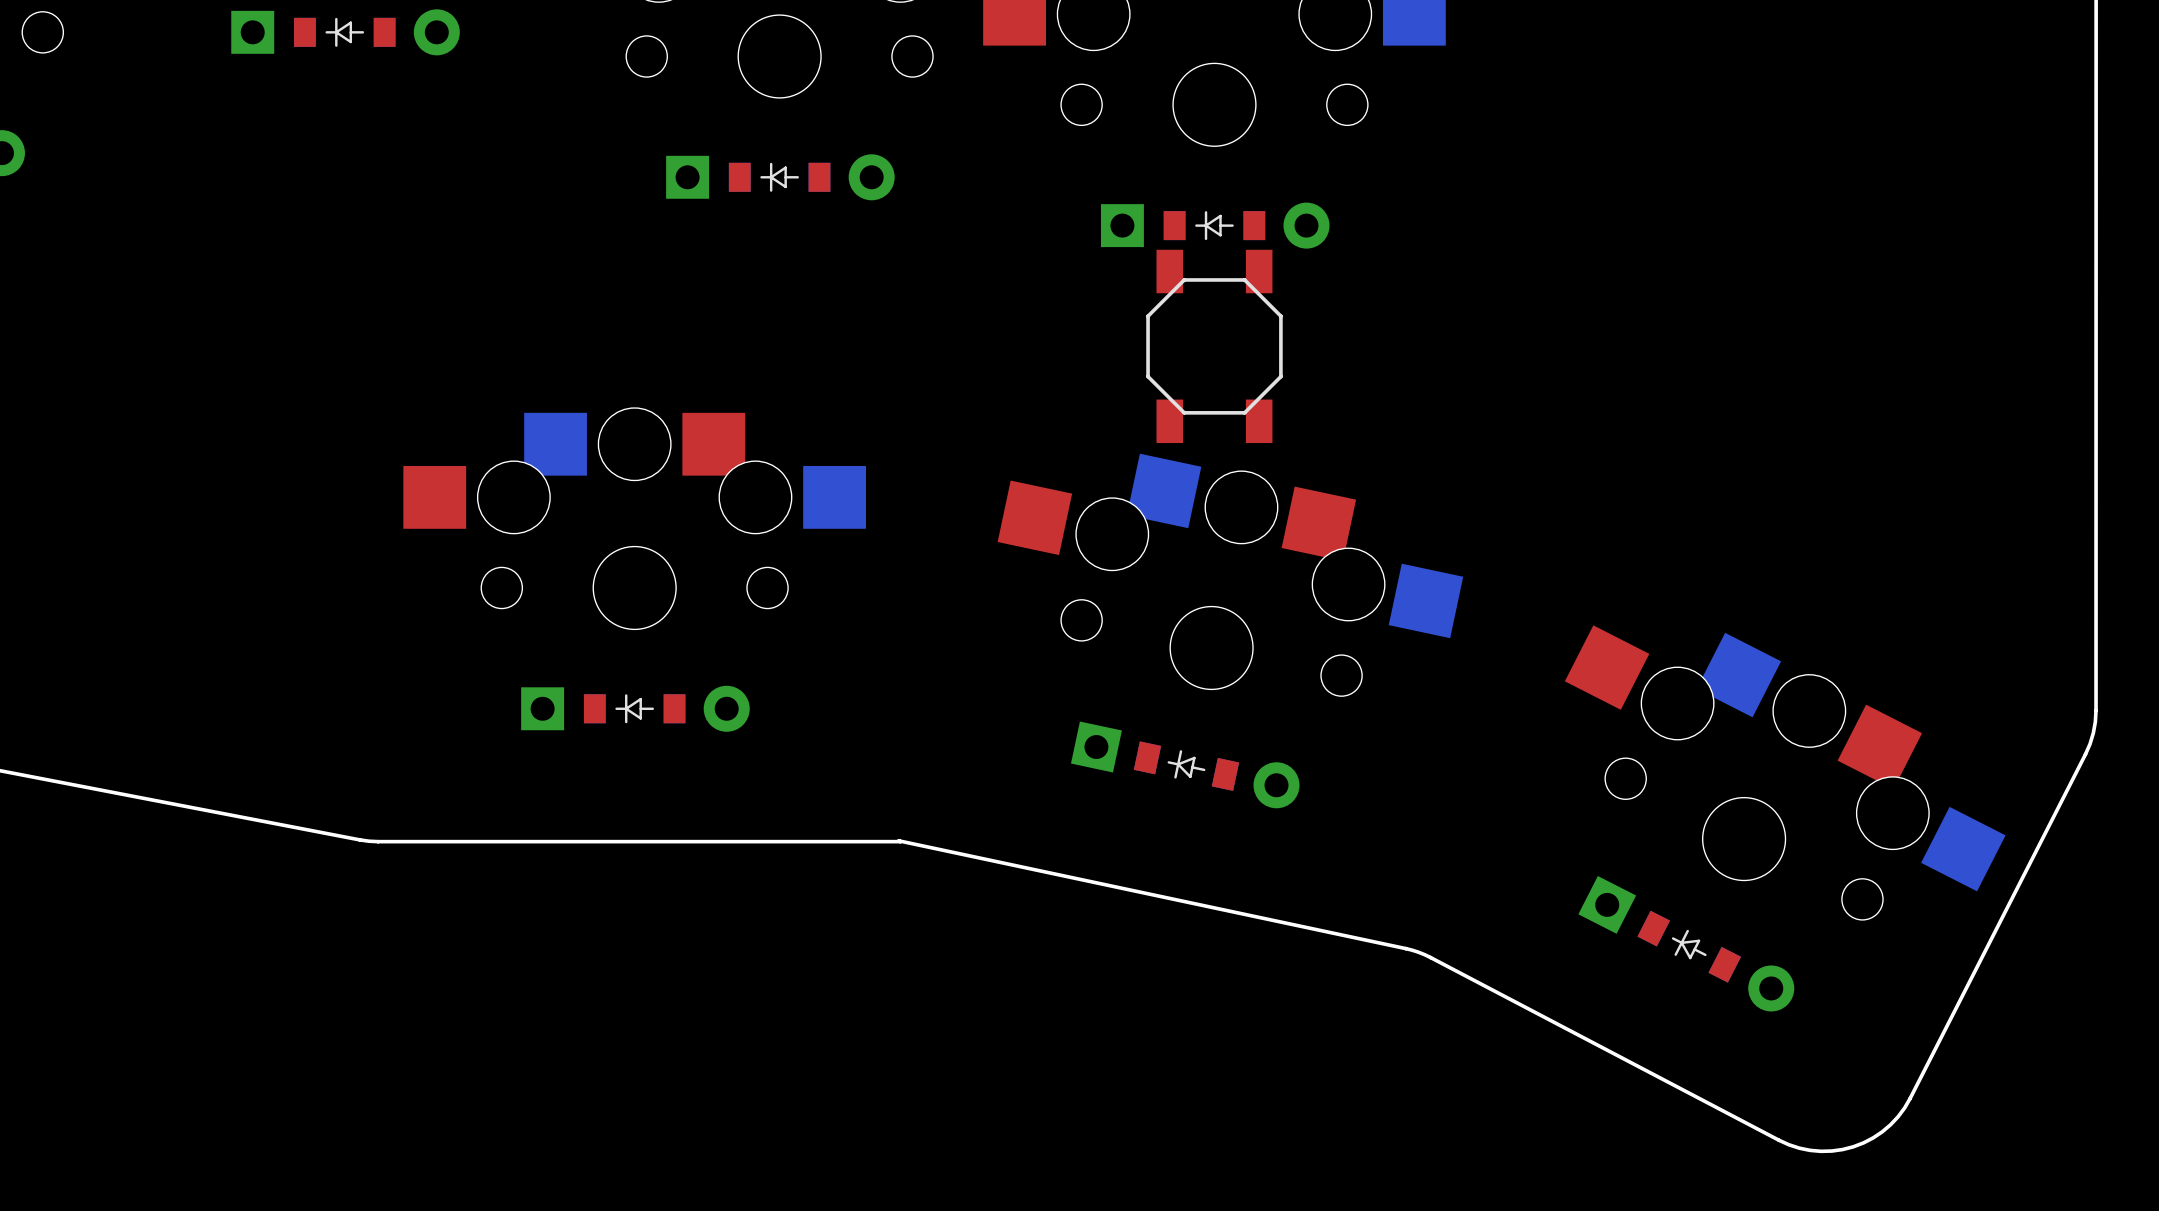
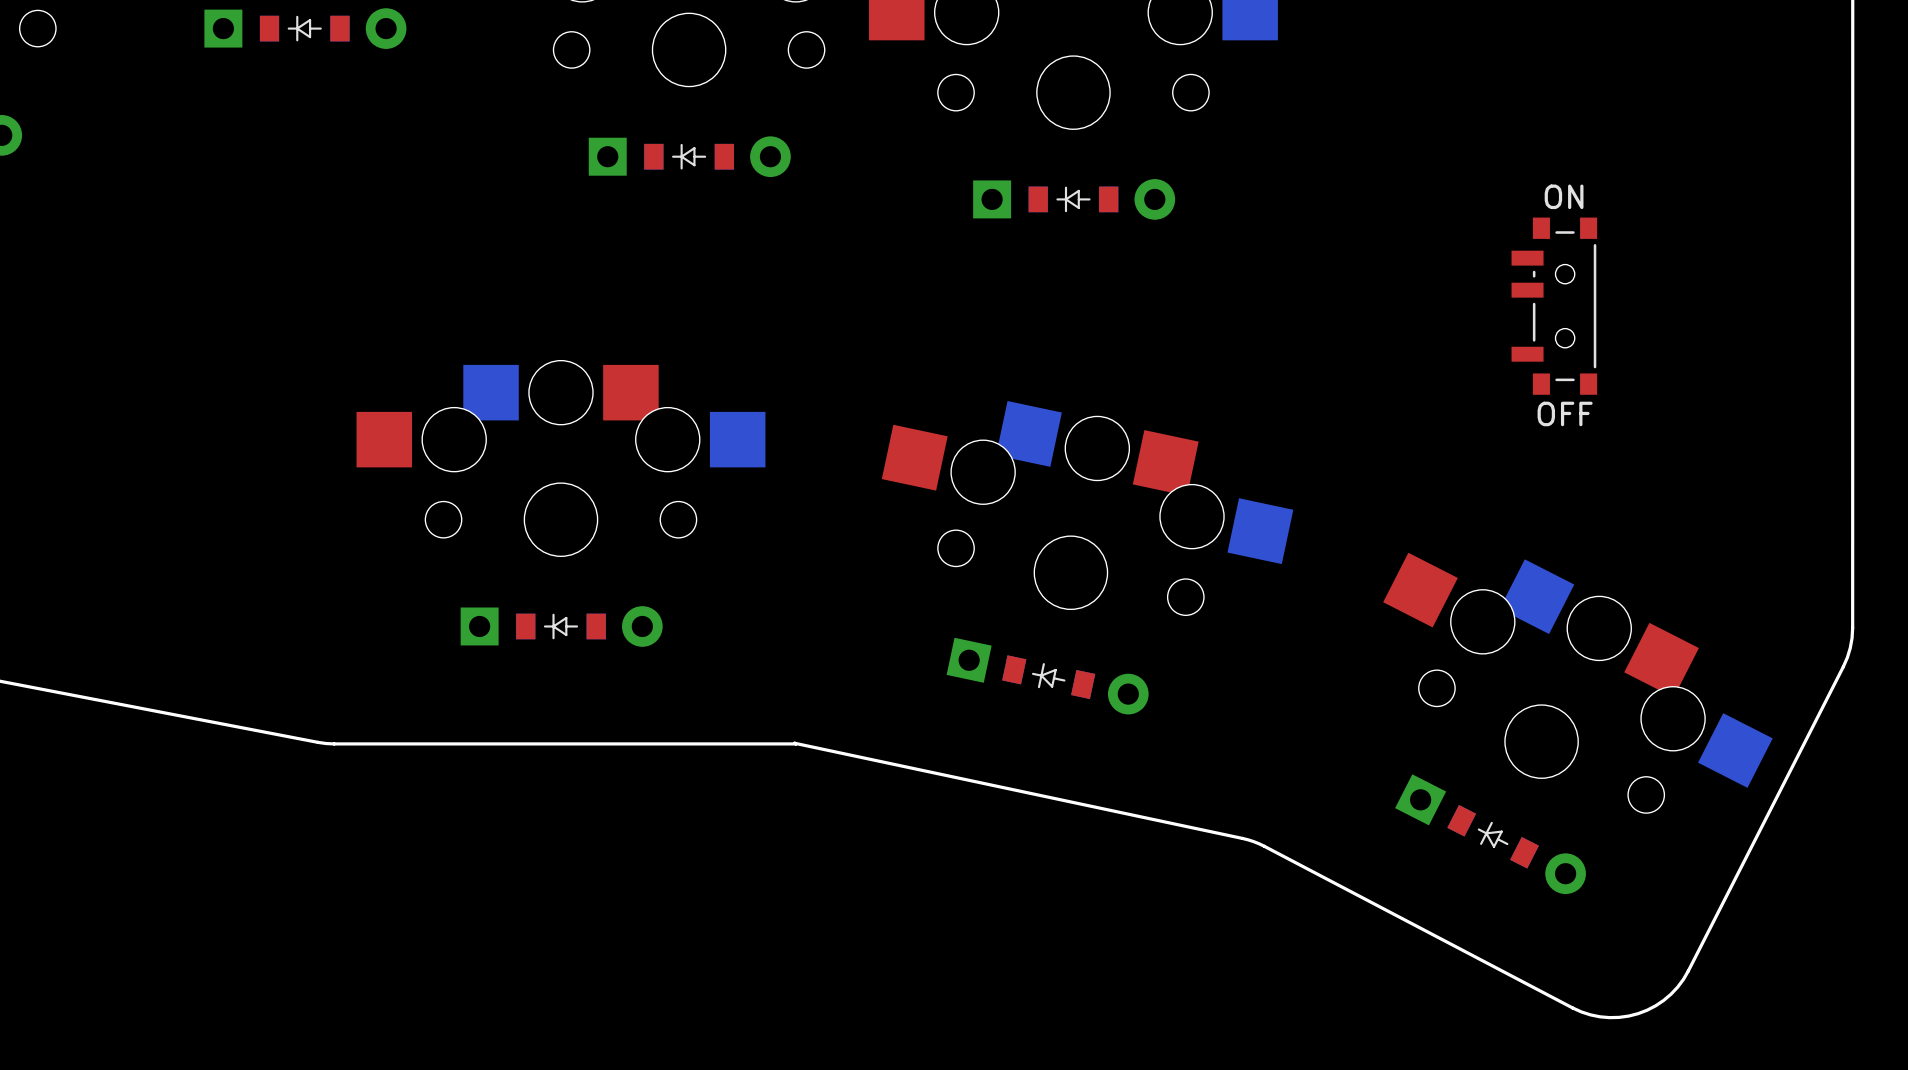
part: (1214, 346) -> none
part: none -> (1554, 306)

